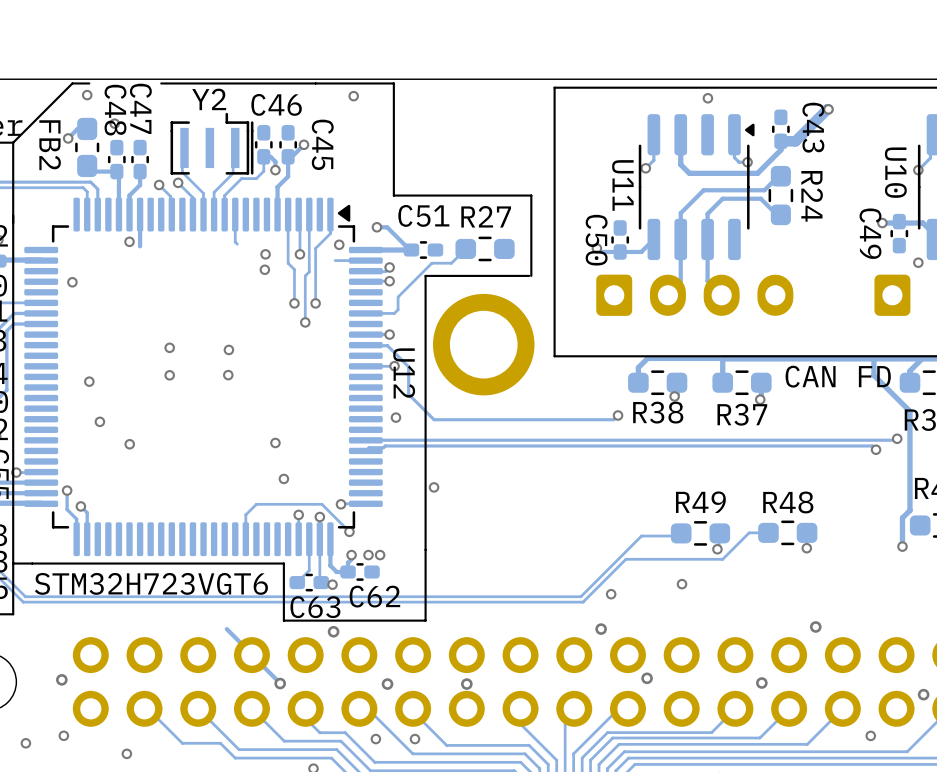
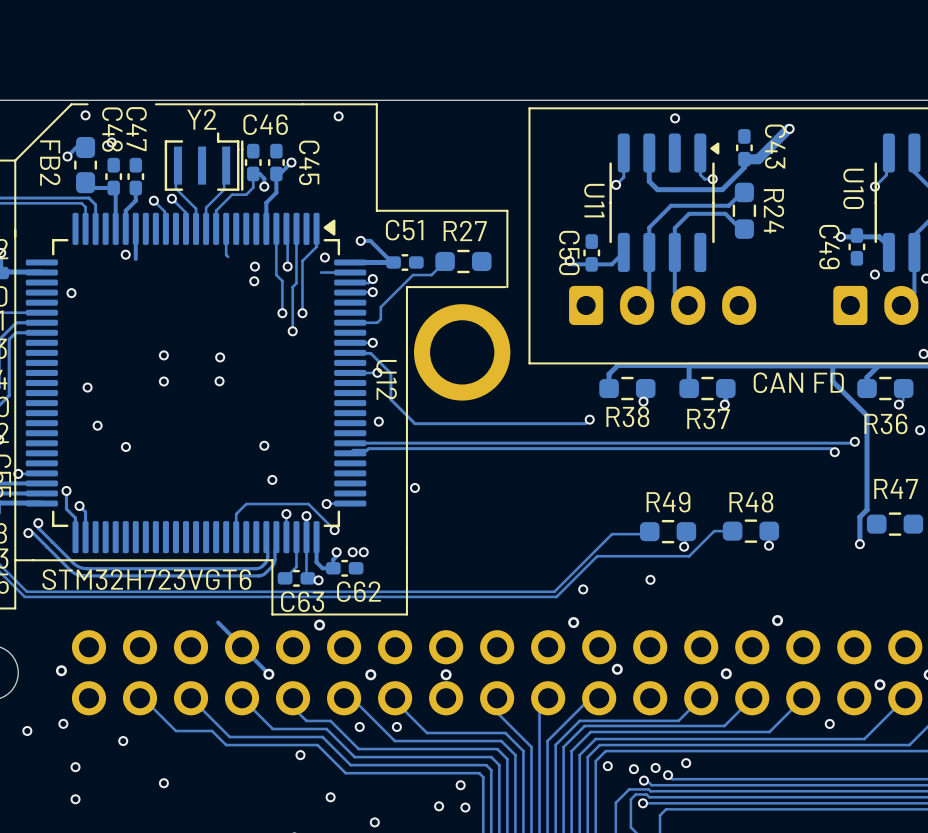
track: none -> (38, 523) (38, 528) (73, 562) (85, 568) (257, 568) (266, 561) (266, 550)
via: none -> (38, 523)
track: none -> (28, 533) (33, 533) (71, 571) (82, 575) (259, 575) (273, 565) (276, 550)
via: none -> (28, 533)

